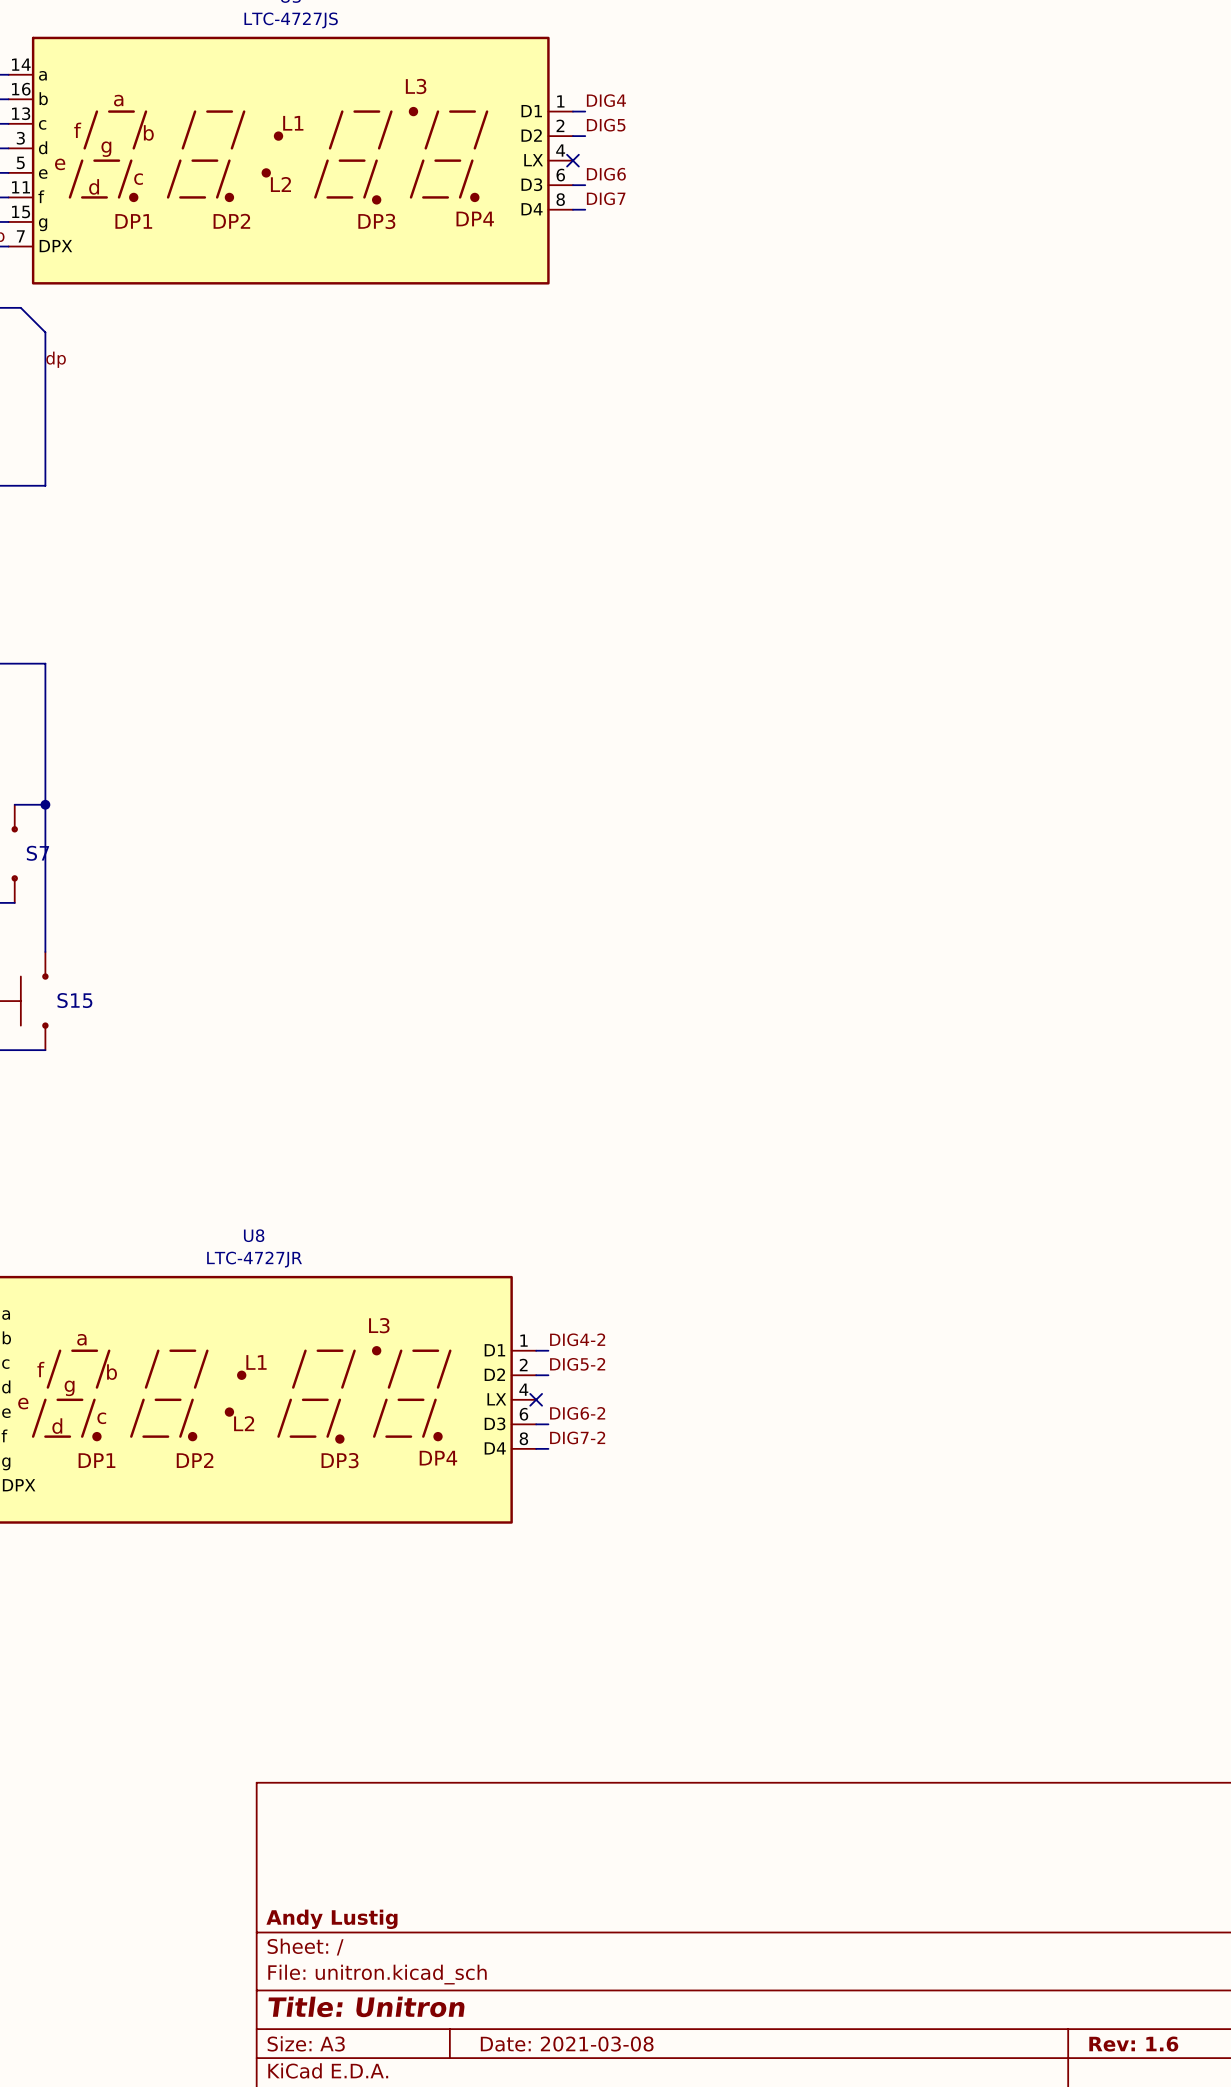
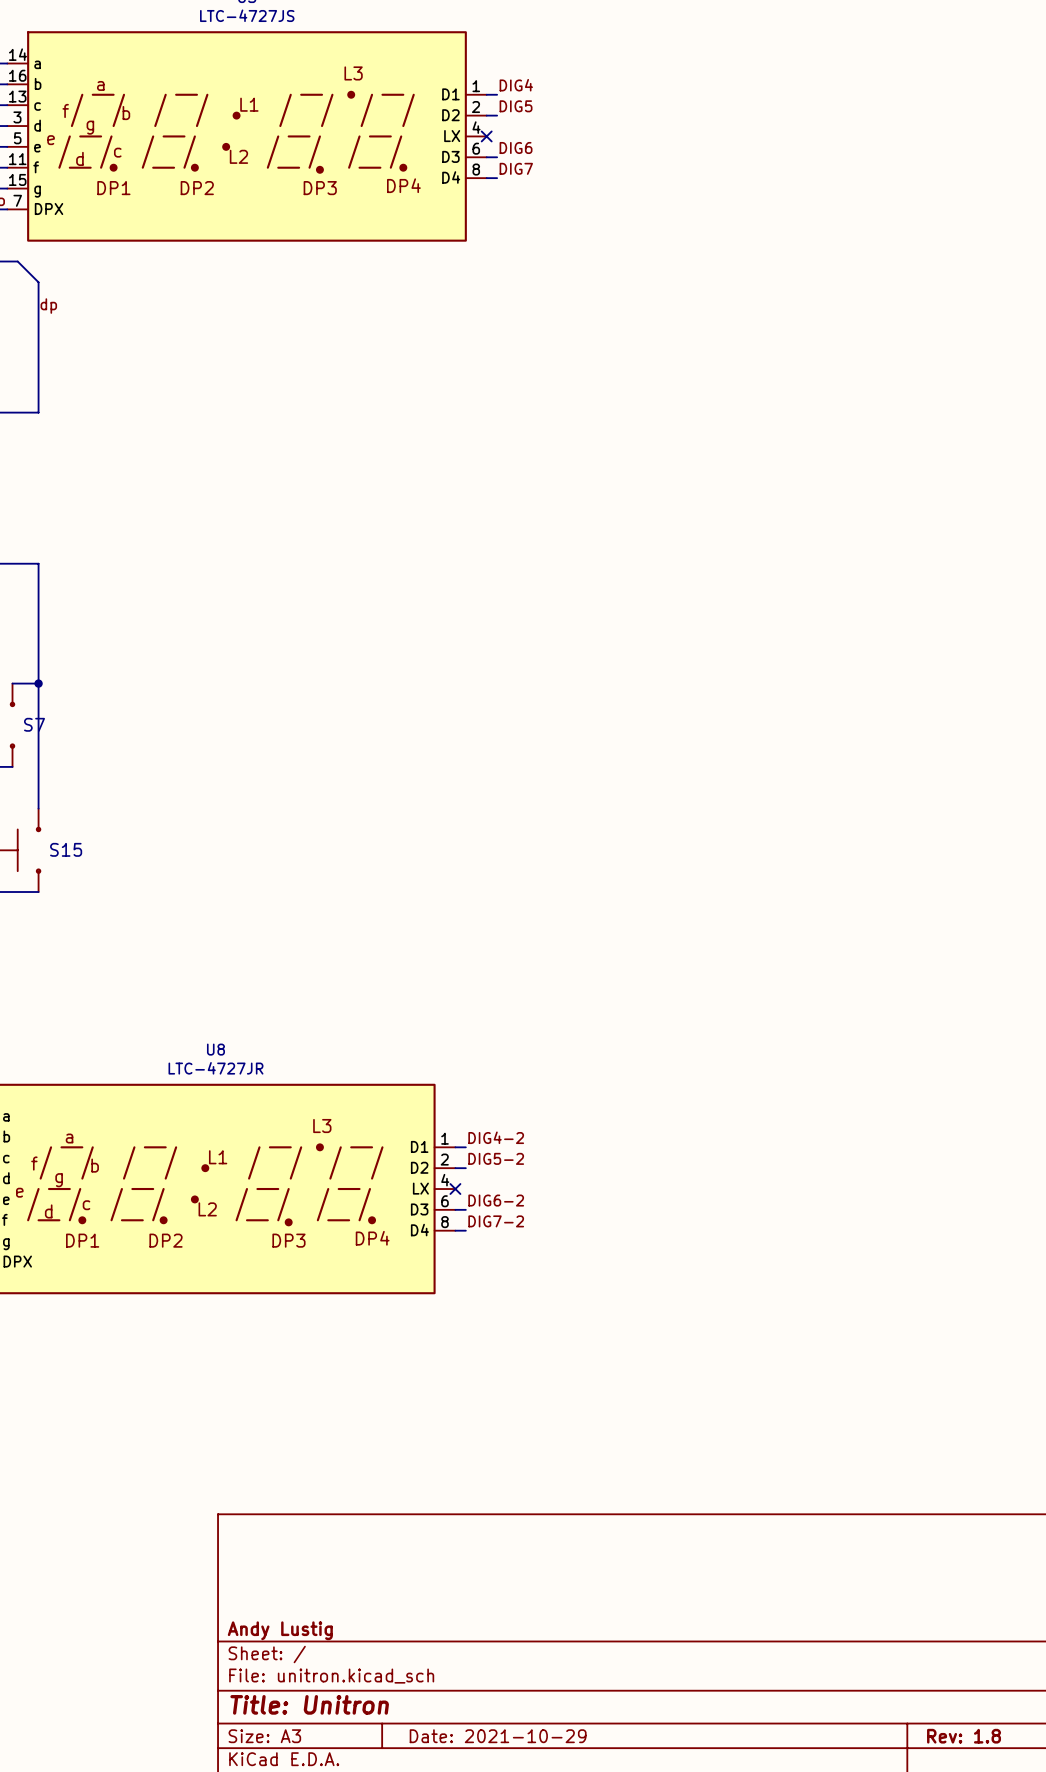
title block: Date: 2021-03-08 (567, 2044) -> Date: 2021-10-29 (498, 1736)
title block: Rev: 1.6 (1133, 2044) -> Rev: 1.8 (964, 1736)

